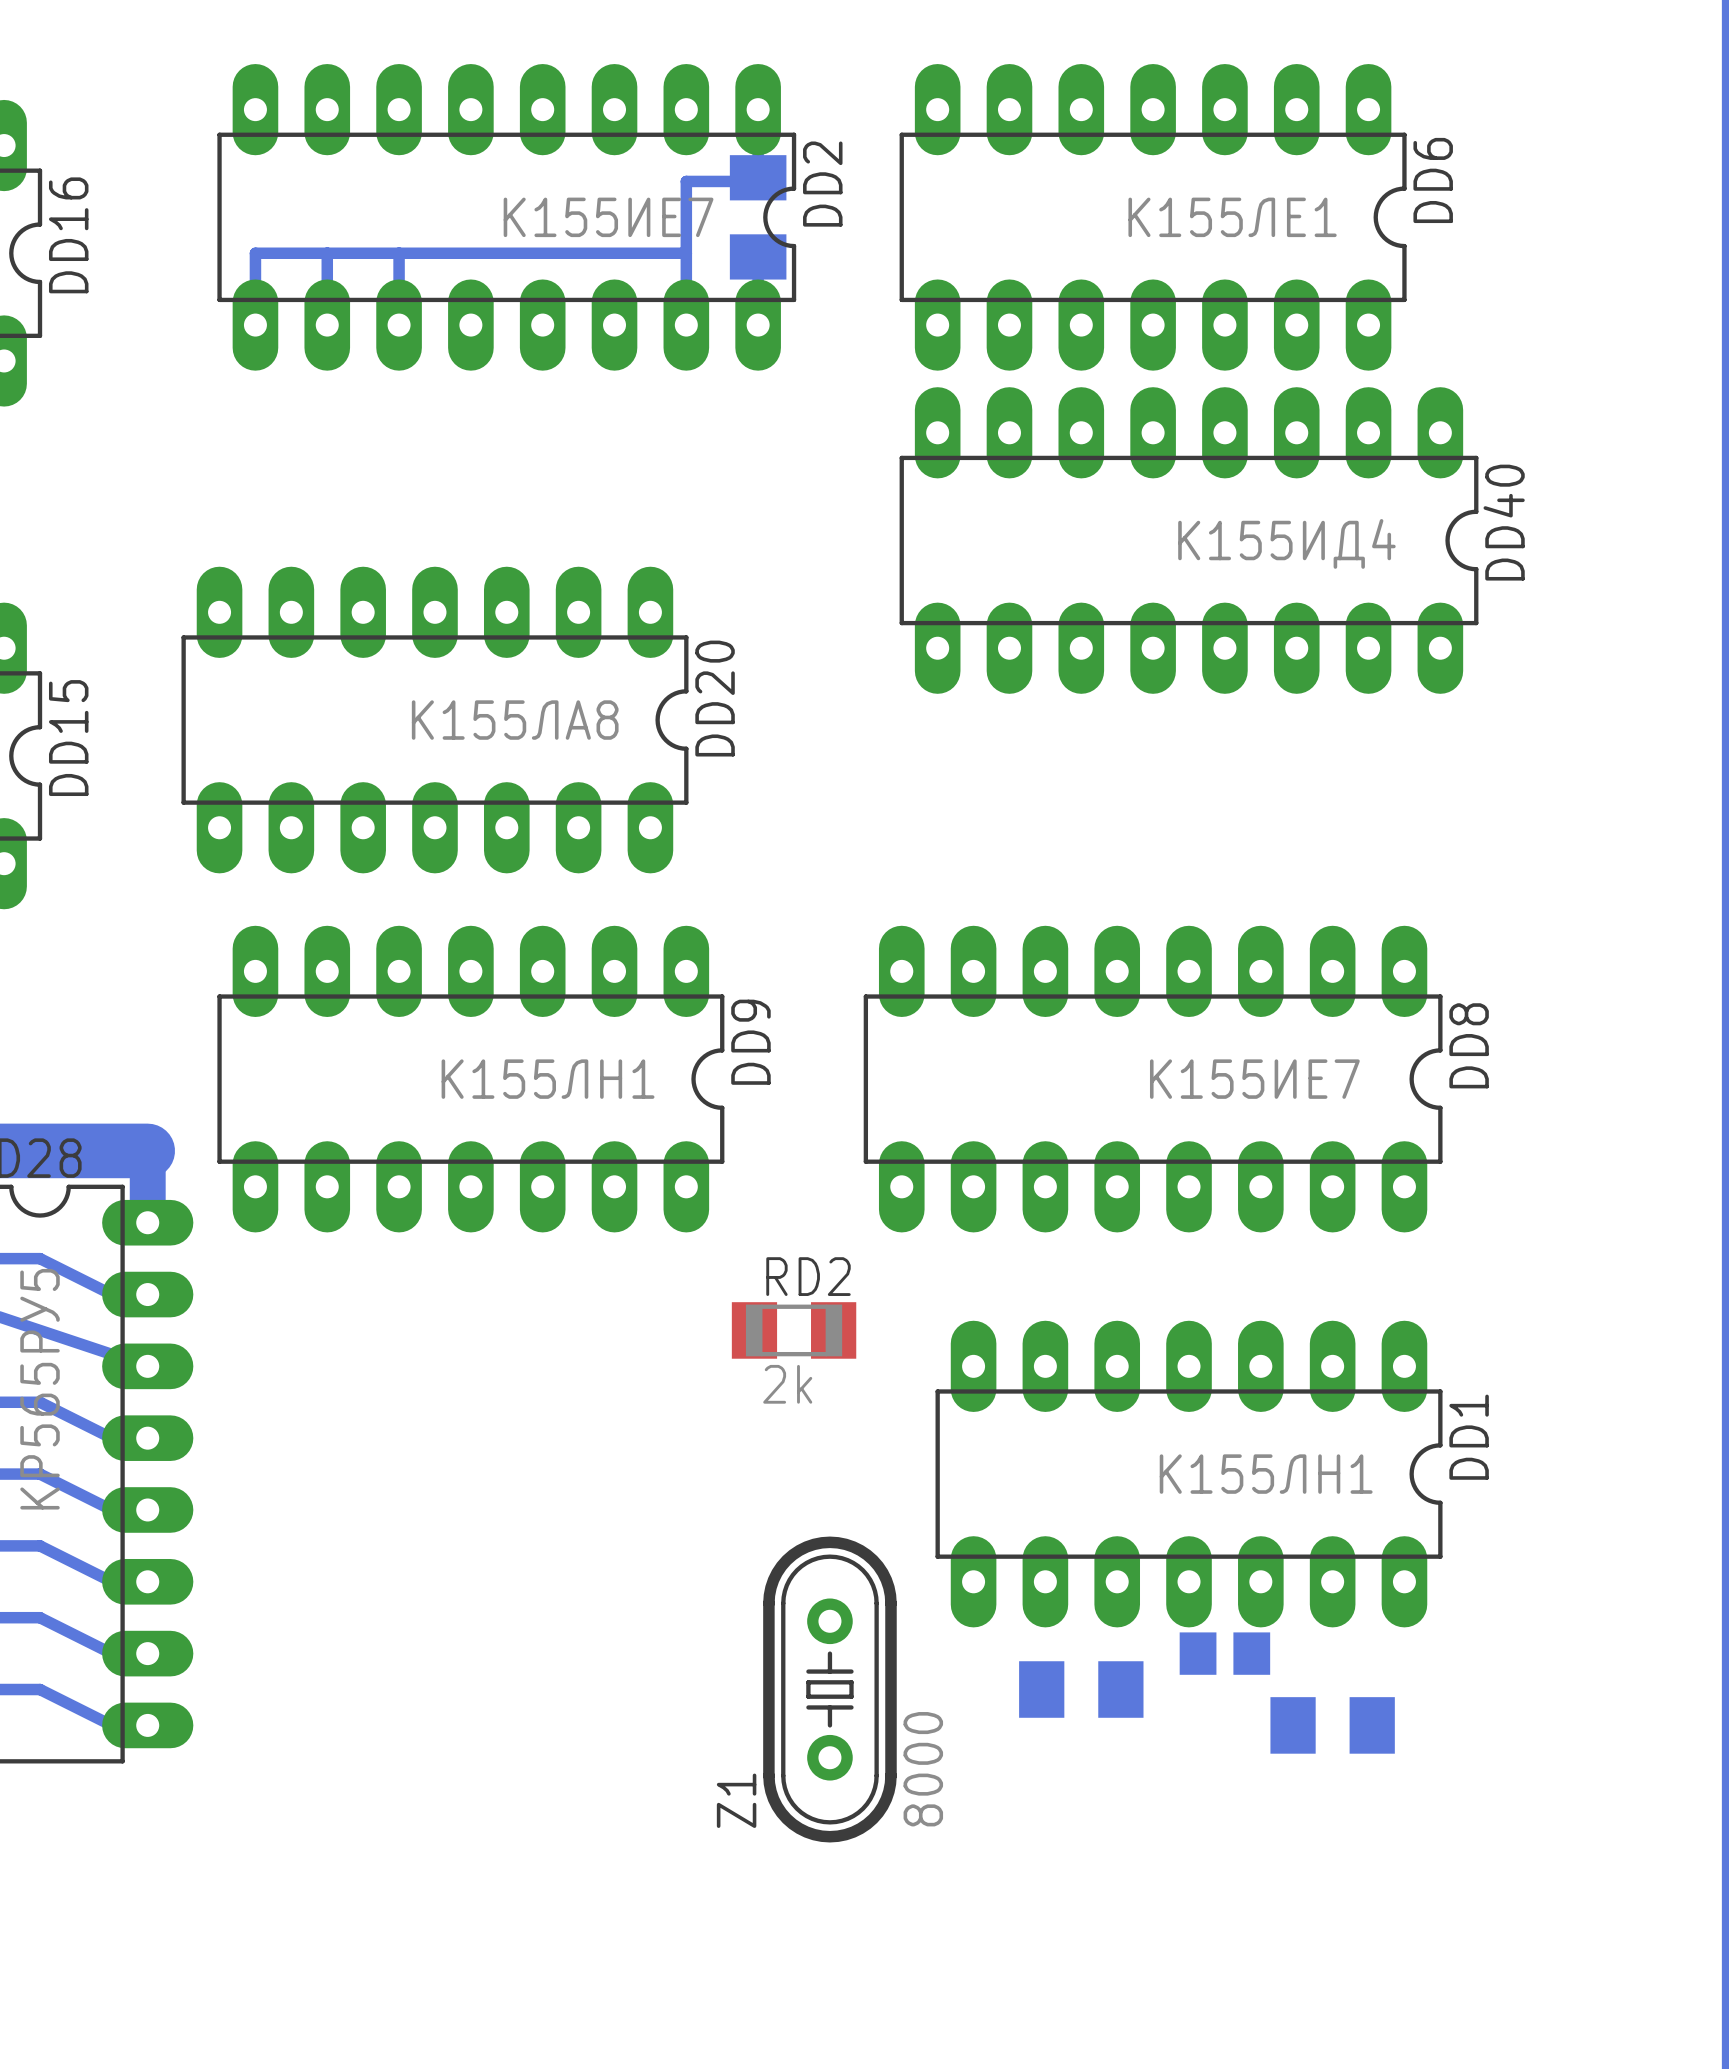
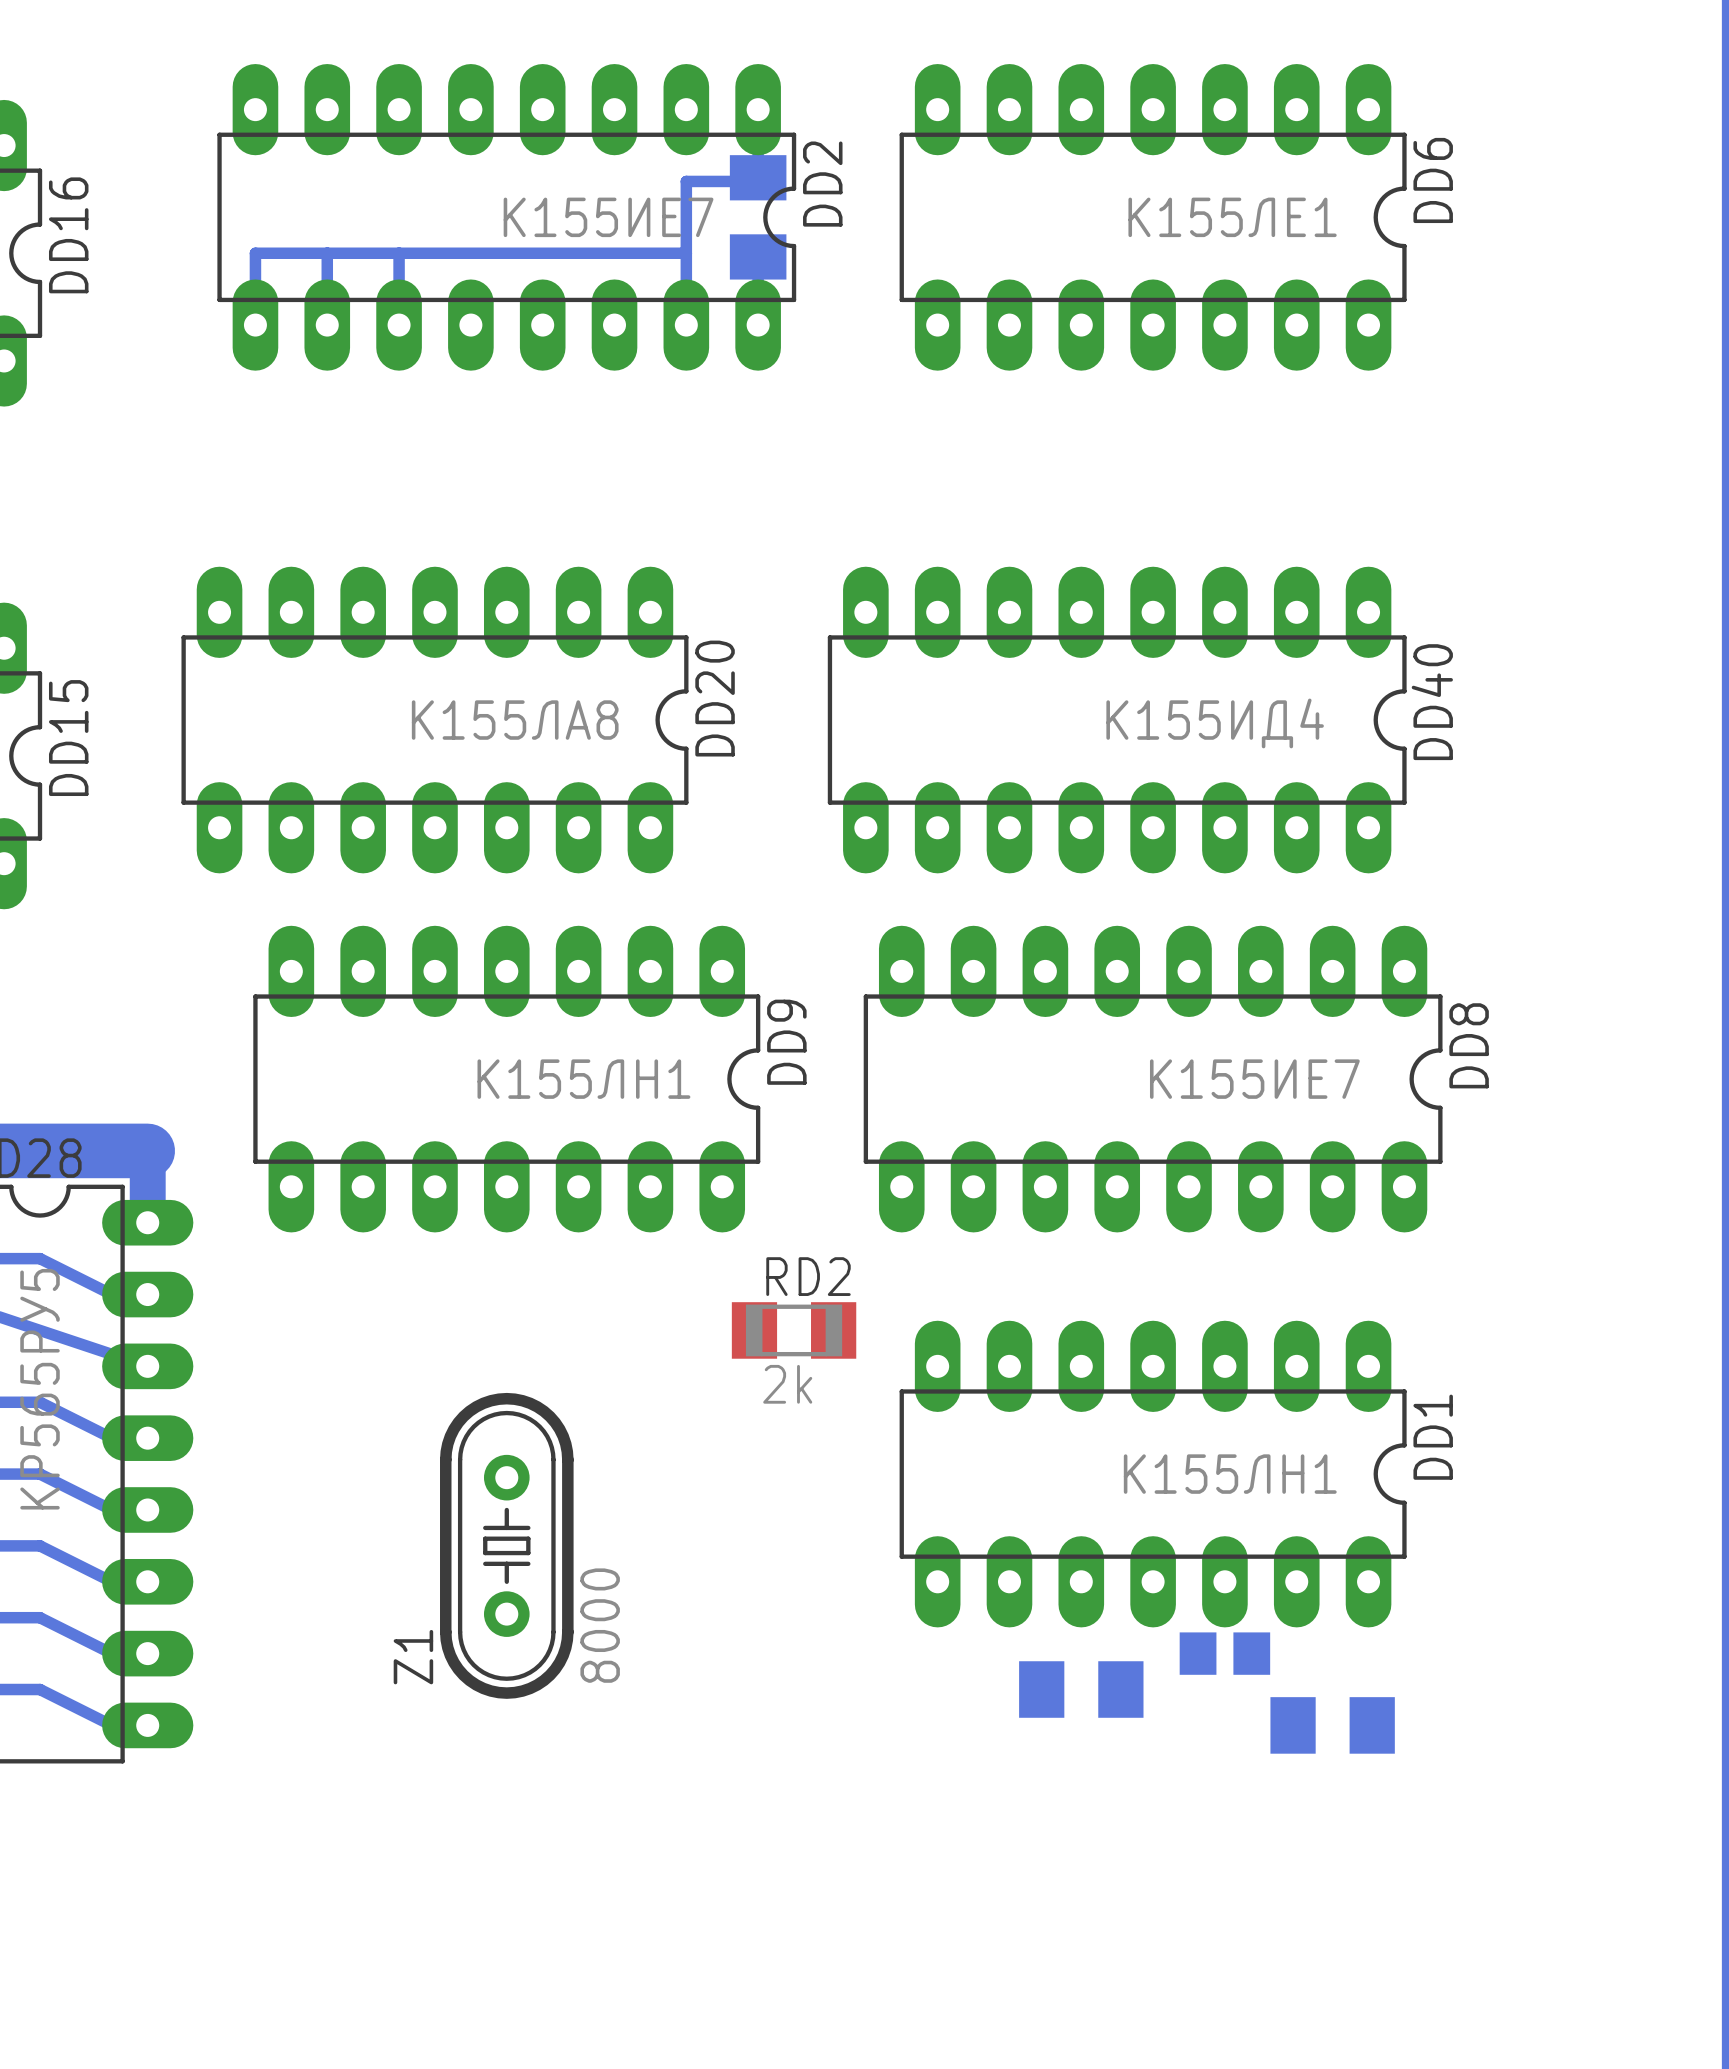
DD40 position: (1189, 540) -> (1117, 720)
DD9 position: (470, 1079) -> (506, 1079)
DD1 position: (1189, 1474) -> (1153, 1474)
Z1 position: (829, 1689) -> (506, 1545)

